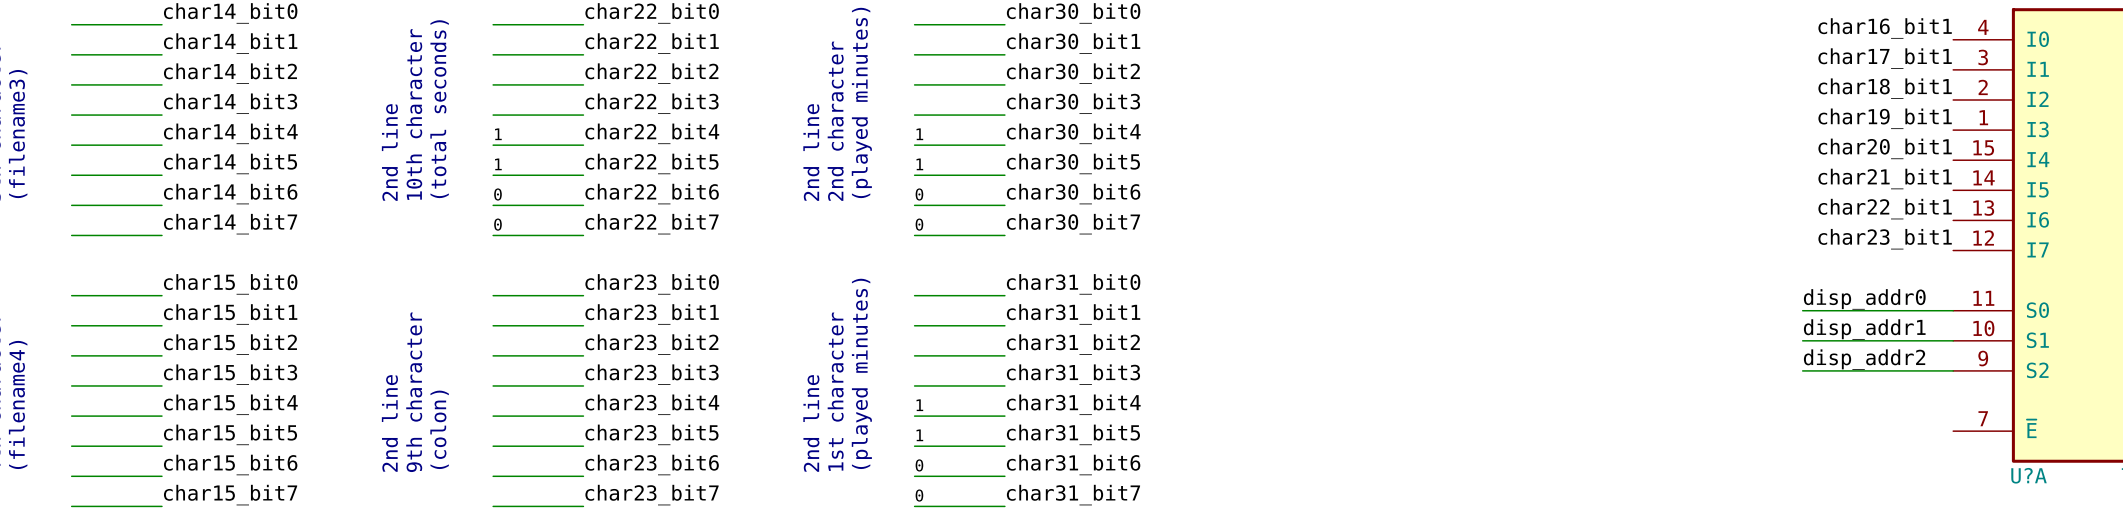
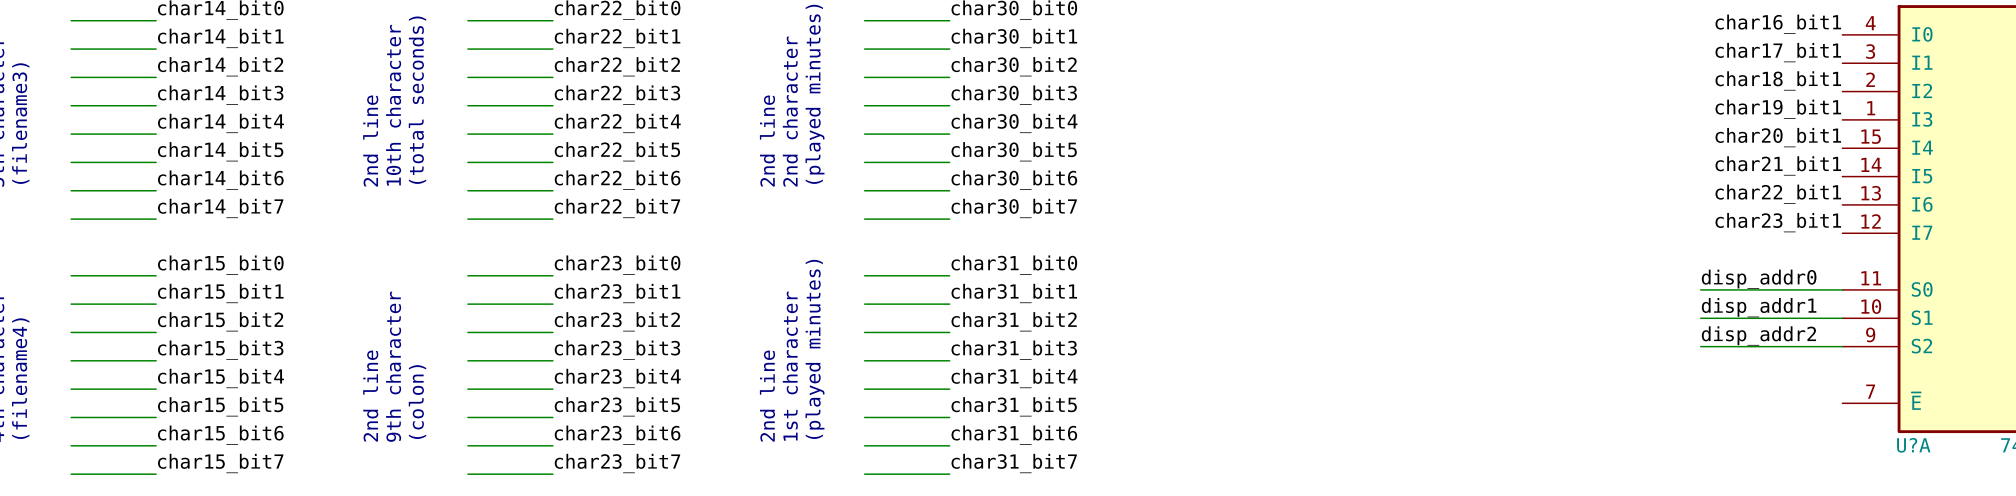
label: 1 (498, 134) -> none
label: 1 (919, 134) -> none
label: 1 (498, 164) -> none
label: 1 (919, 164) -> none
label: 0 (497, 194) -> none
label: 0 (919, 194) -> none
label: 0 (497, 224) -> none
label: 0 (919, 224) -> none
label: 1 (919, 405) -> none
label: 1 (919, 435) -> none
label: 0 (919, 465) -> none
label: 0 (919, 495) -> none

